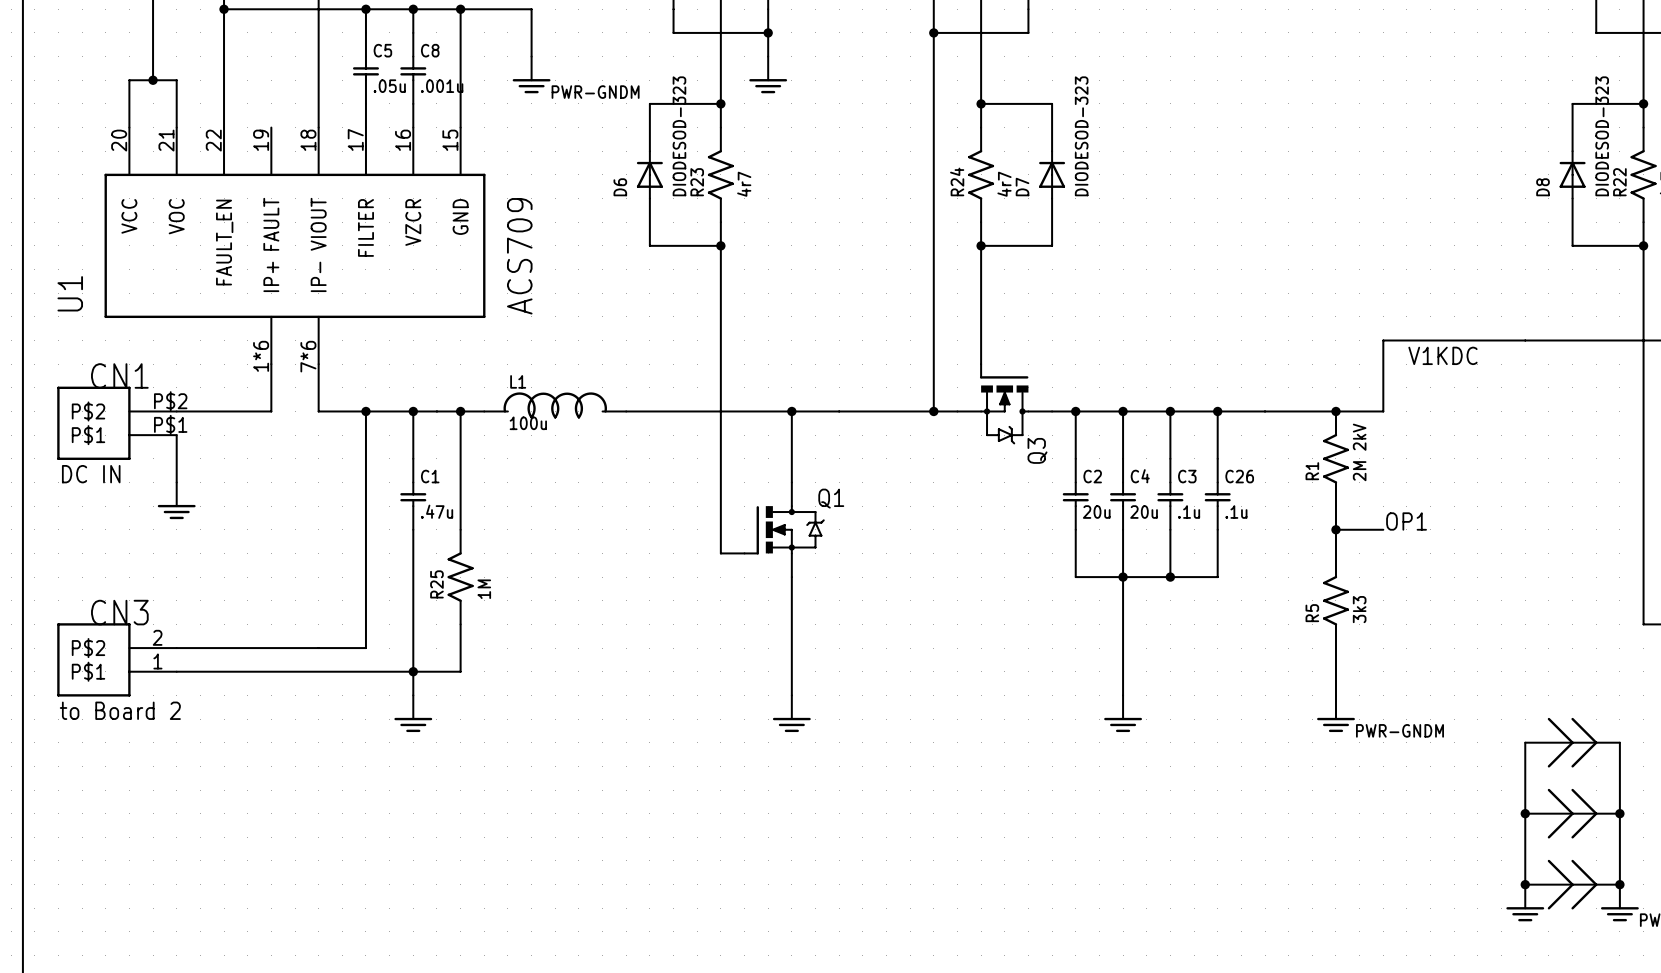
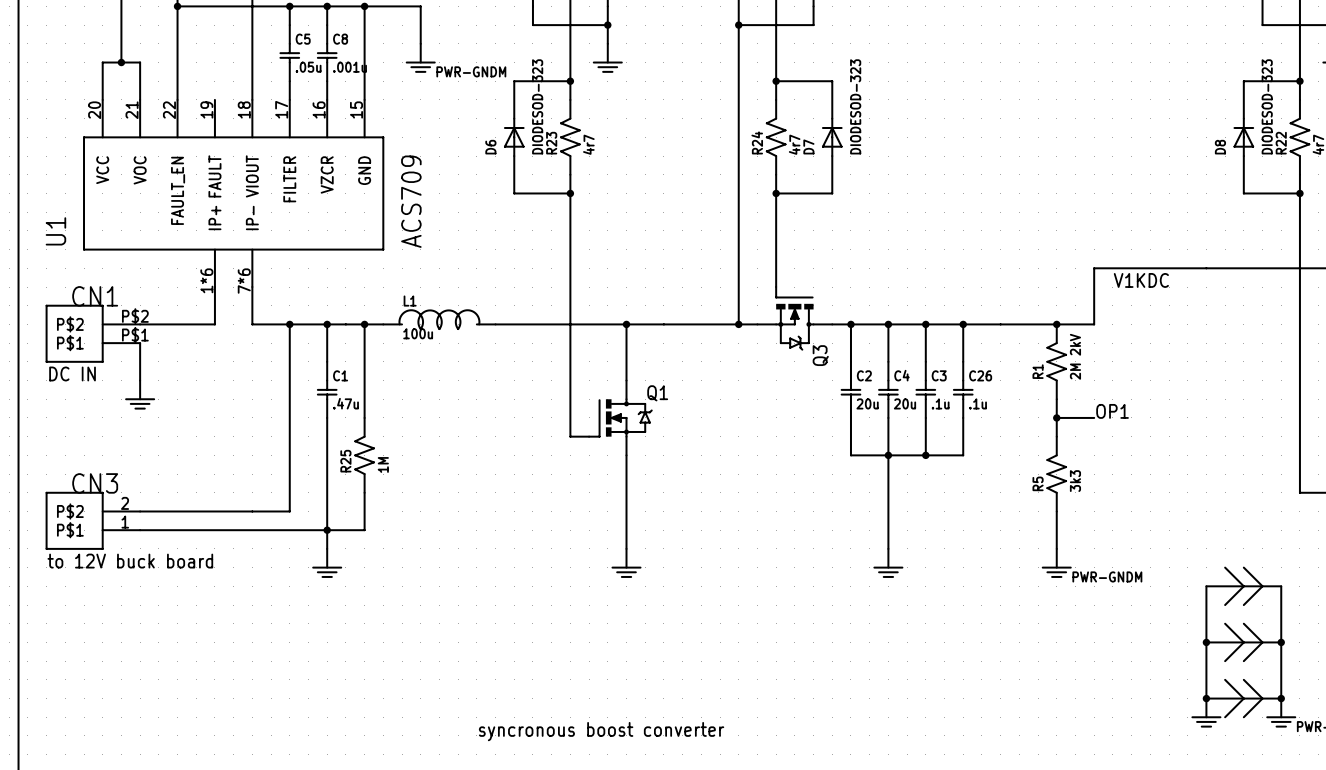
text: to Board 2 (120, 710) -> to 12V buck board (130, 561)
text: none -> syncronous boost converter (601, 731)

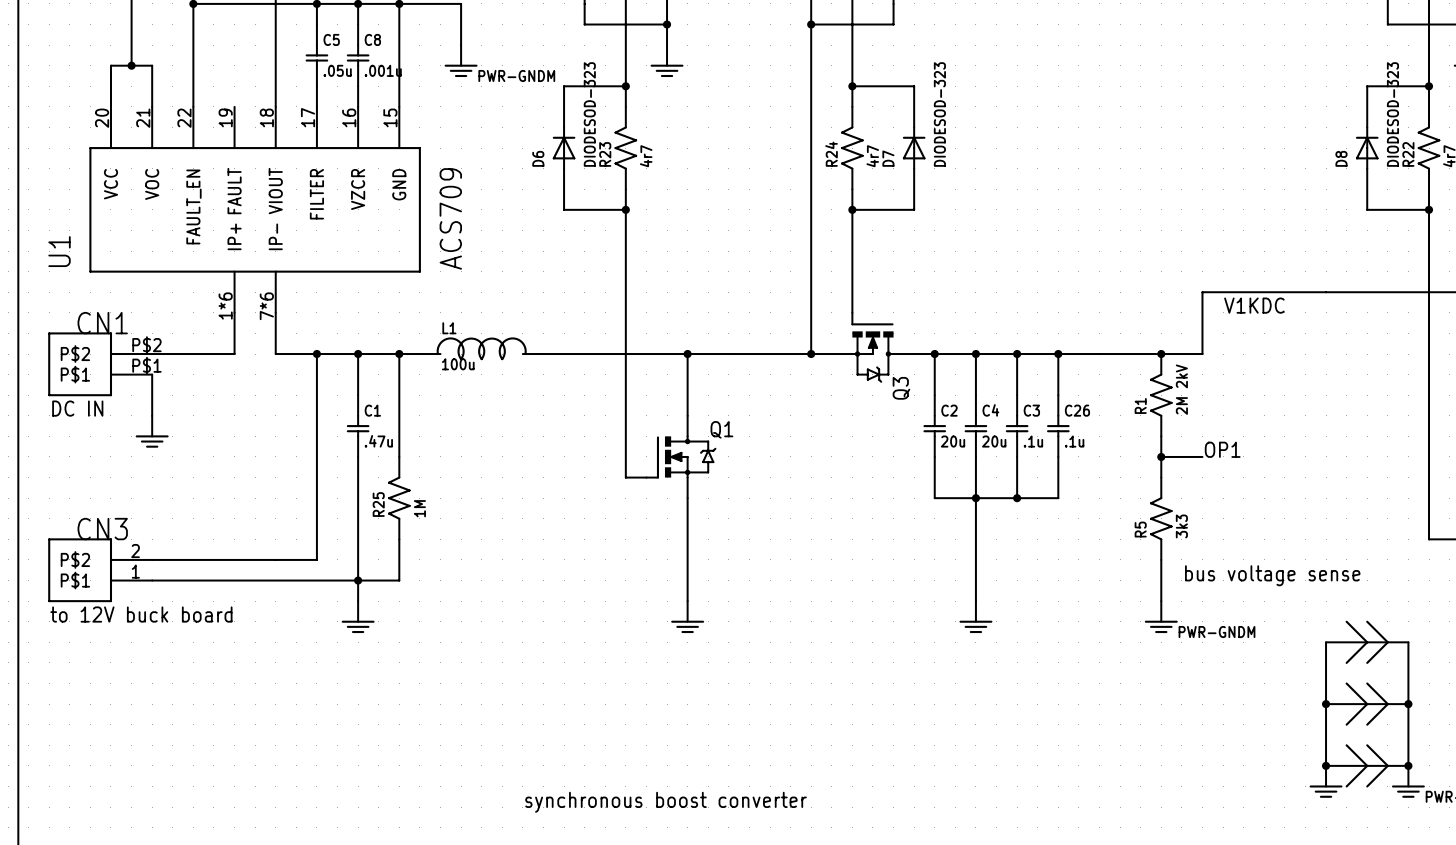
text: none -> bus voltage sense (1272, 575)
text: syncronous boost converter (601, 731) -> synchronous boost converter (666, 802)

